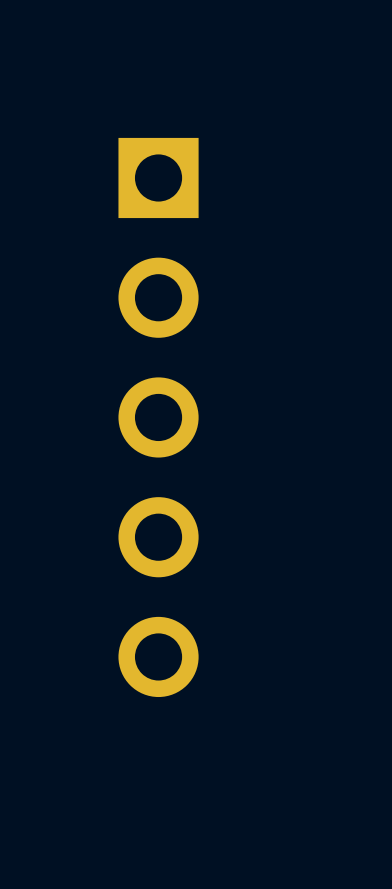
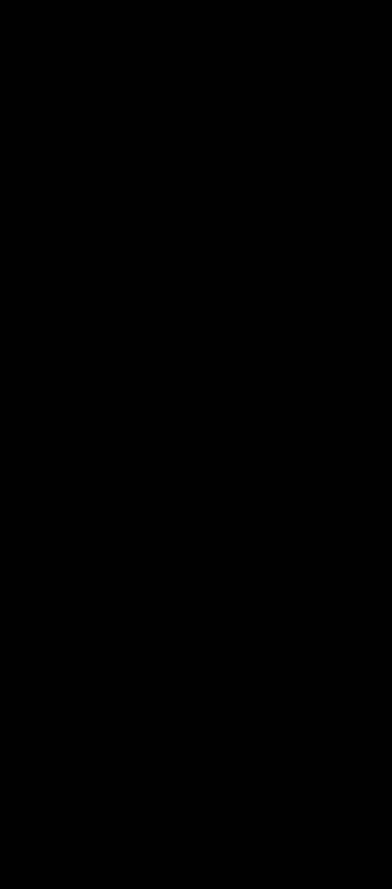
part: (158, 417) -> none

